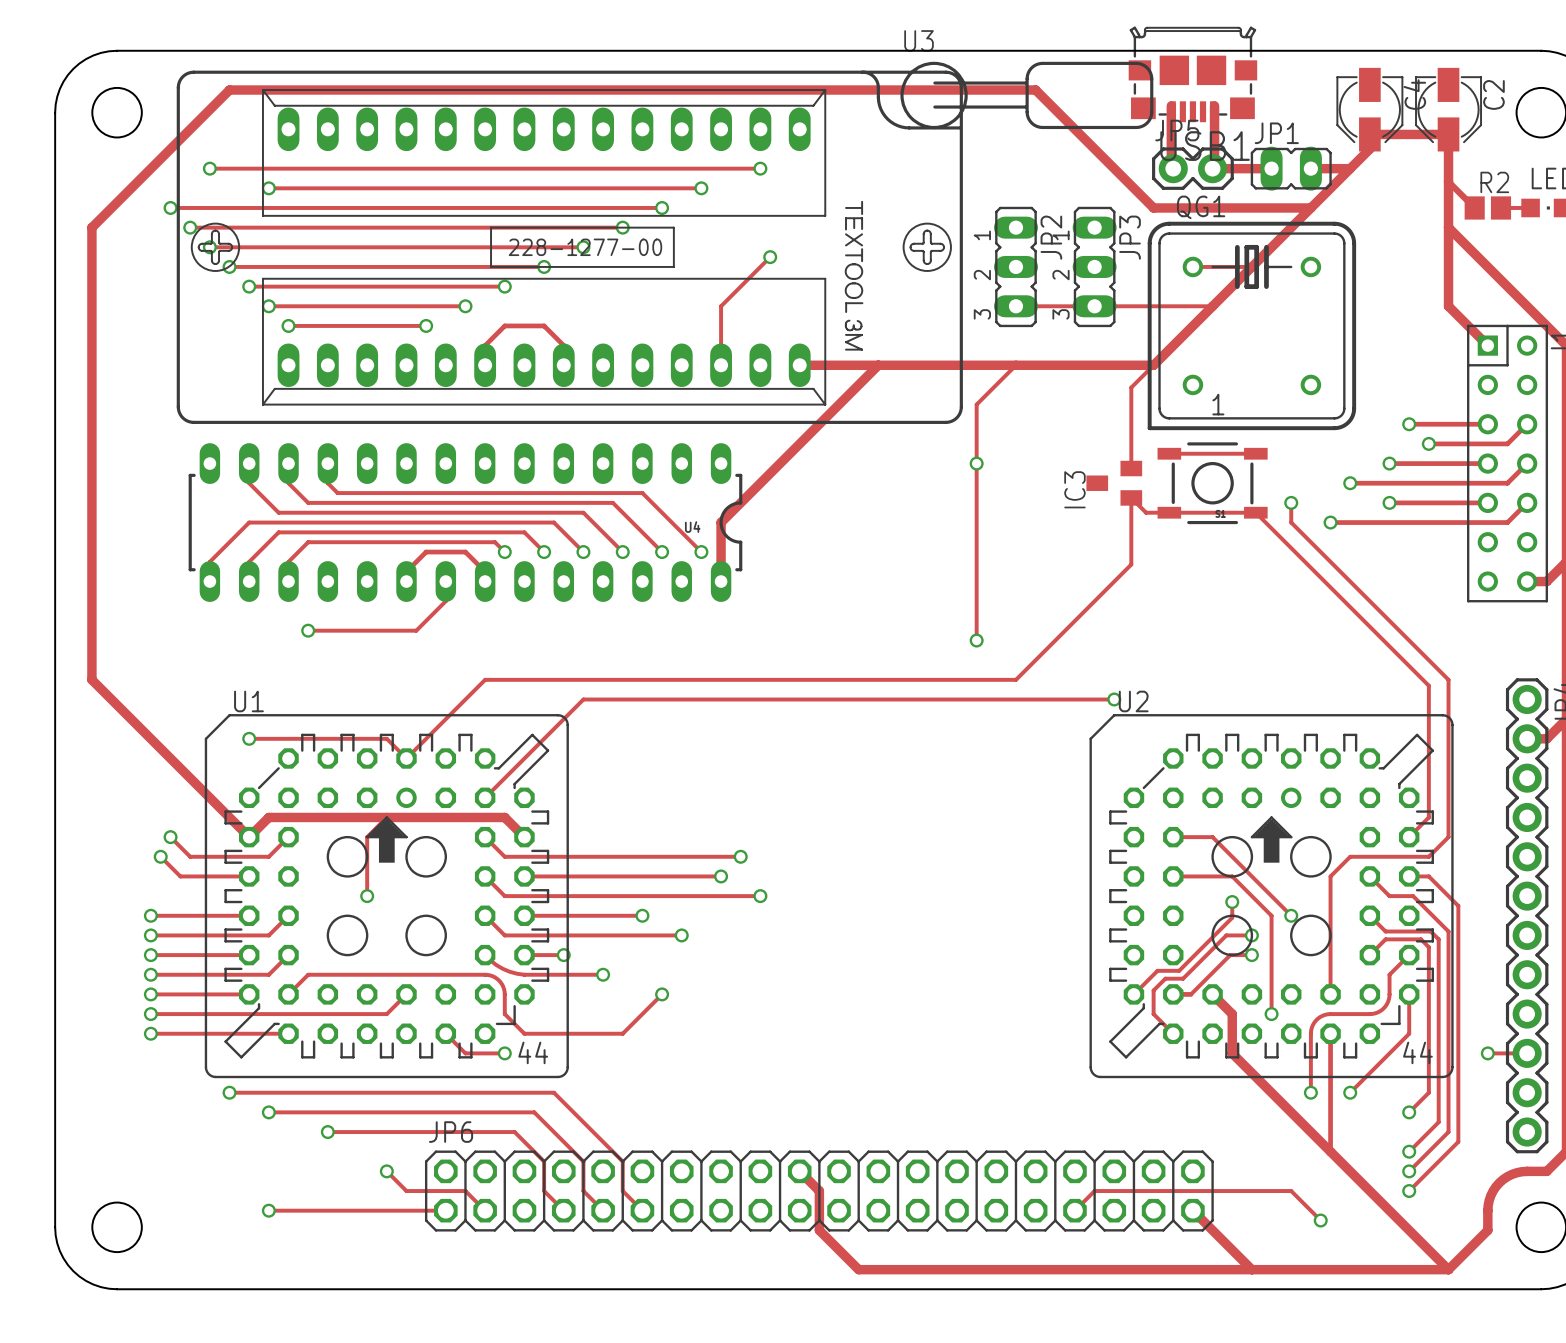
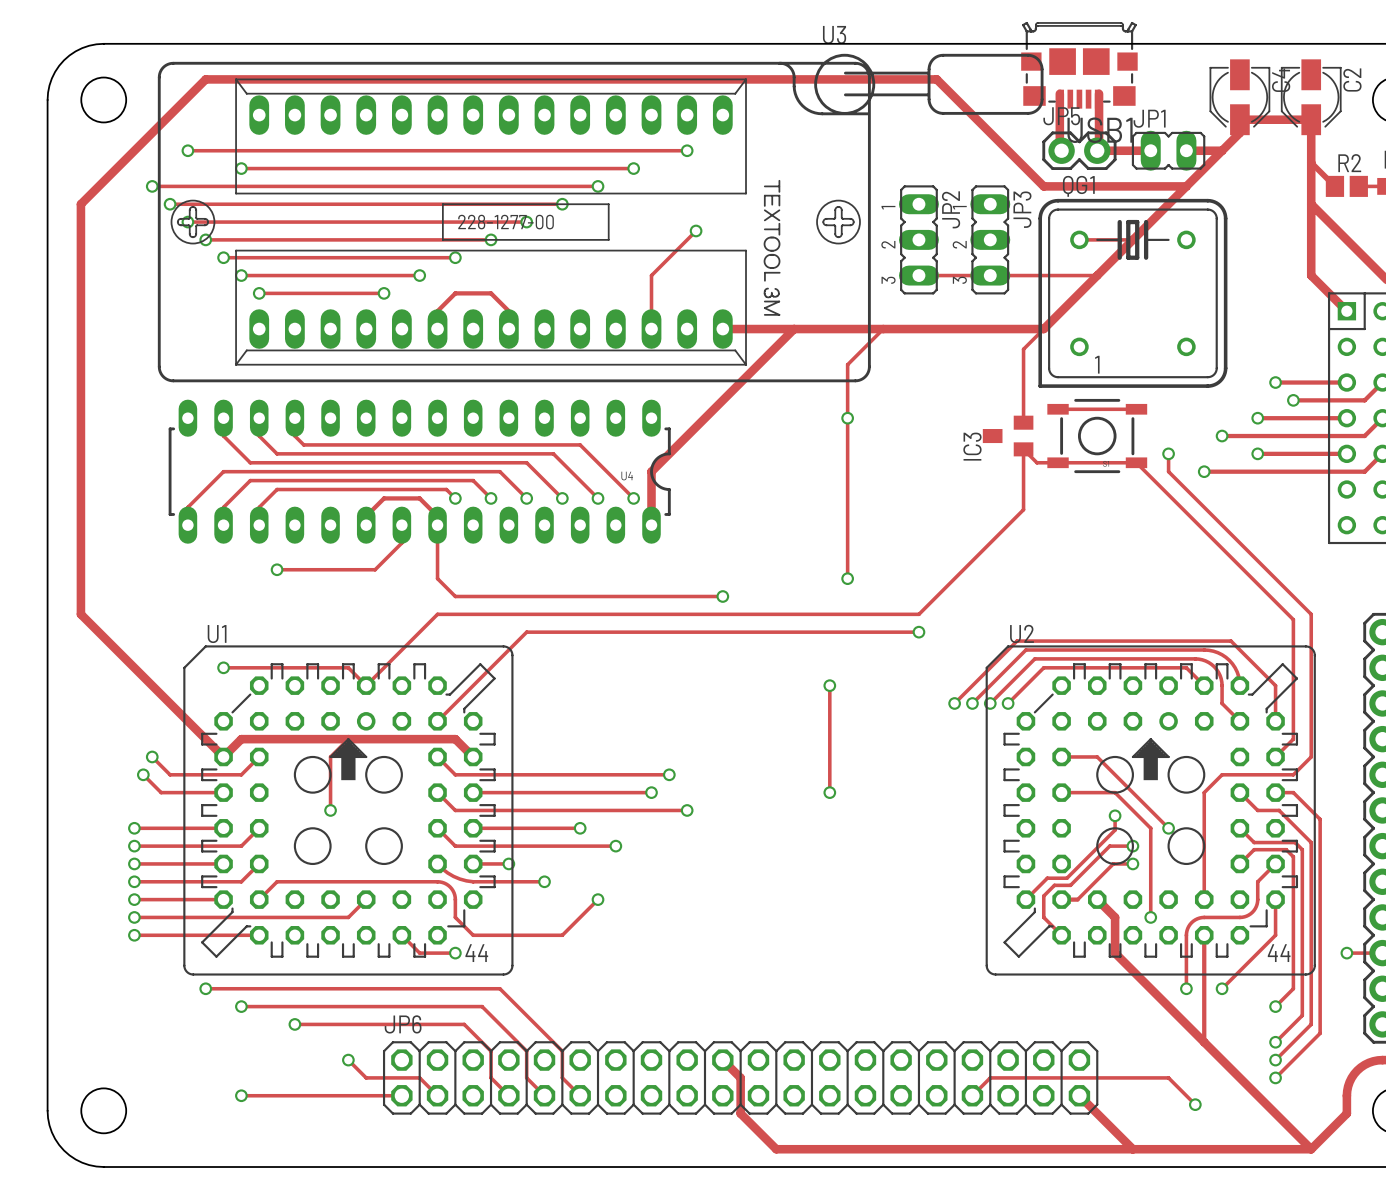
track: (1015, 365) (976, 404) (976, 640) -> (883, 329) (847, 364) (847, 578)
via position: (976, 463) -> (847, 418)
track: none -> (437, 525) (437, 578) (455, 596) (722, 596)
via: none -> (847, 578)
via: (976, 640) -> none
via: none -> (722, 596)
track: (1015, 699) (1114, 699) -> none
via: none -> (918, 632)
via: (1114, 699) -> none
track: none -> (829, 685) (829, 792)
via: none -> (829, 685)
track: none -> (1204, 685) (1186, 667) (1043, 667) (1008, 703)
track: none -> (1239, 685) (1237, 672) (1229, 660) (1222, 654) (1208, 650) (1025, 649) (972, 703)
track: none -> (954, 703) (1017, 641) (1230, 641) (1275, 685) (1275, 721)
via: none -> (954, 703)
via: none -> (972, 703)
track: none -> (990, 703) (1034, 658) (1198, 659) (1208, 662) (1218, 672) (1221, 682) (1222, 703) (1239, 721)
via: none -> (990, 703)
via: none -> (1008, 703)
via: none -> (829, 792)

